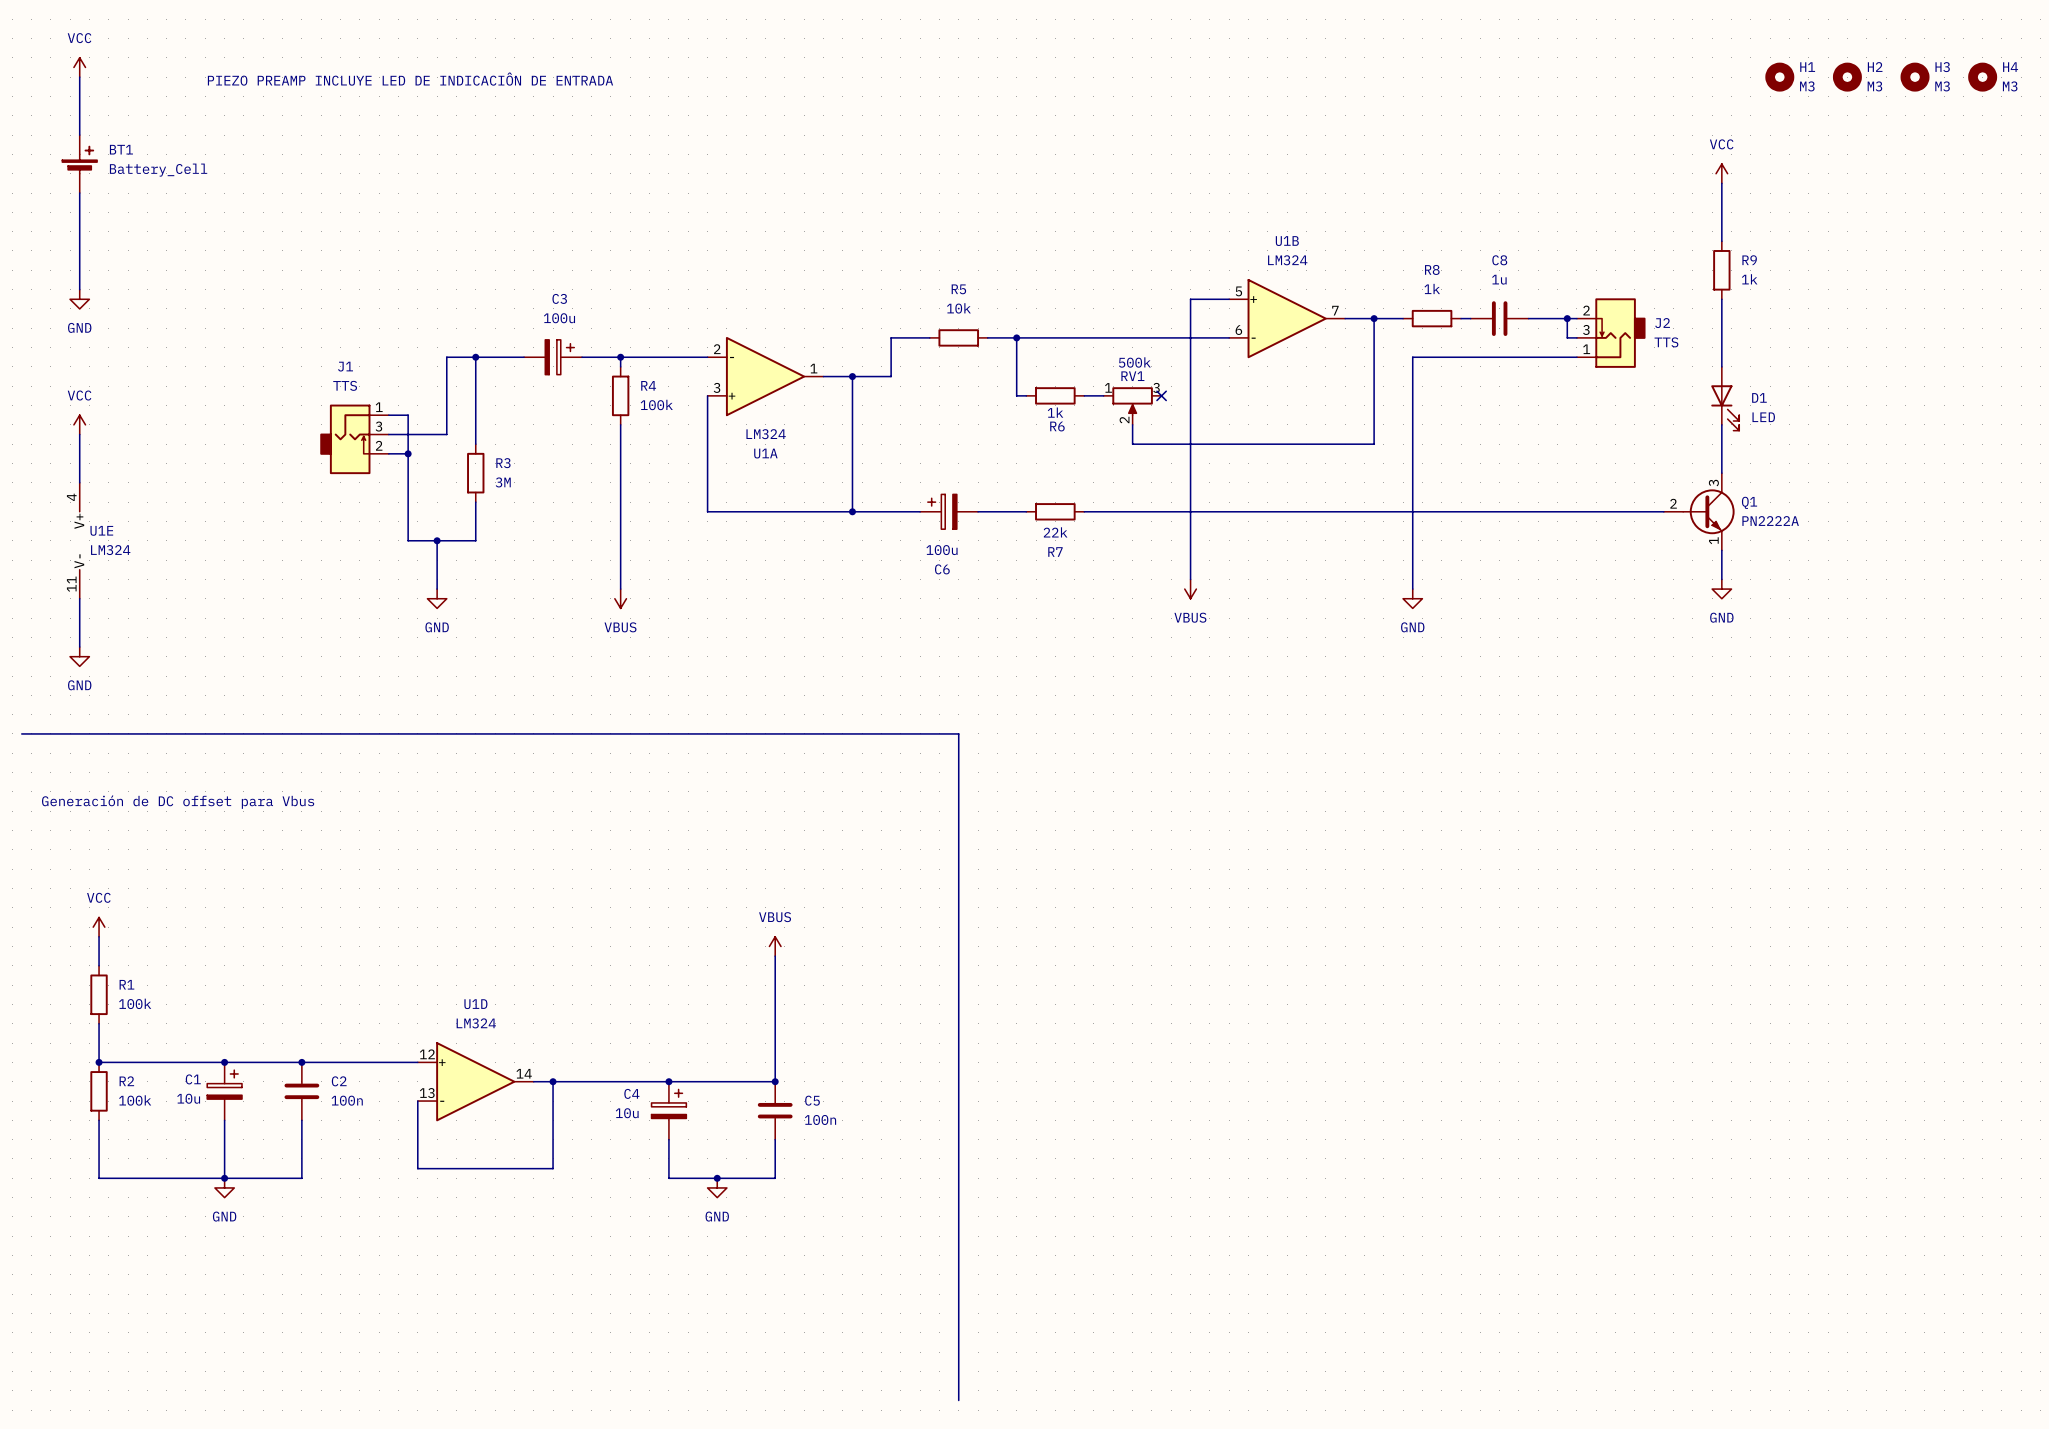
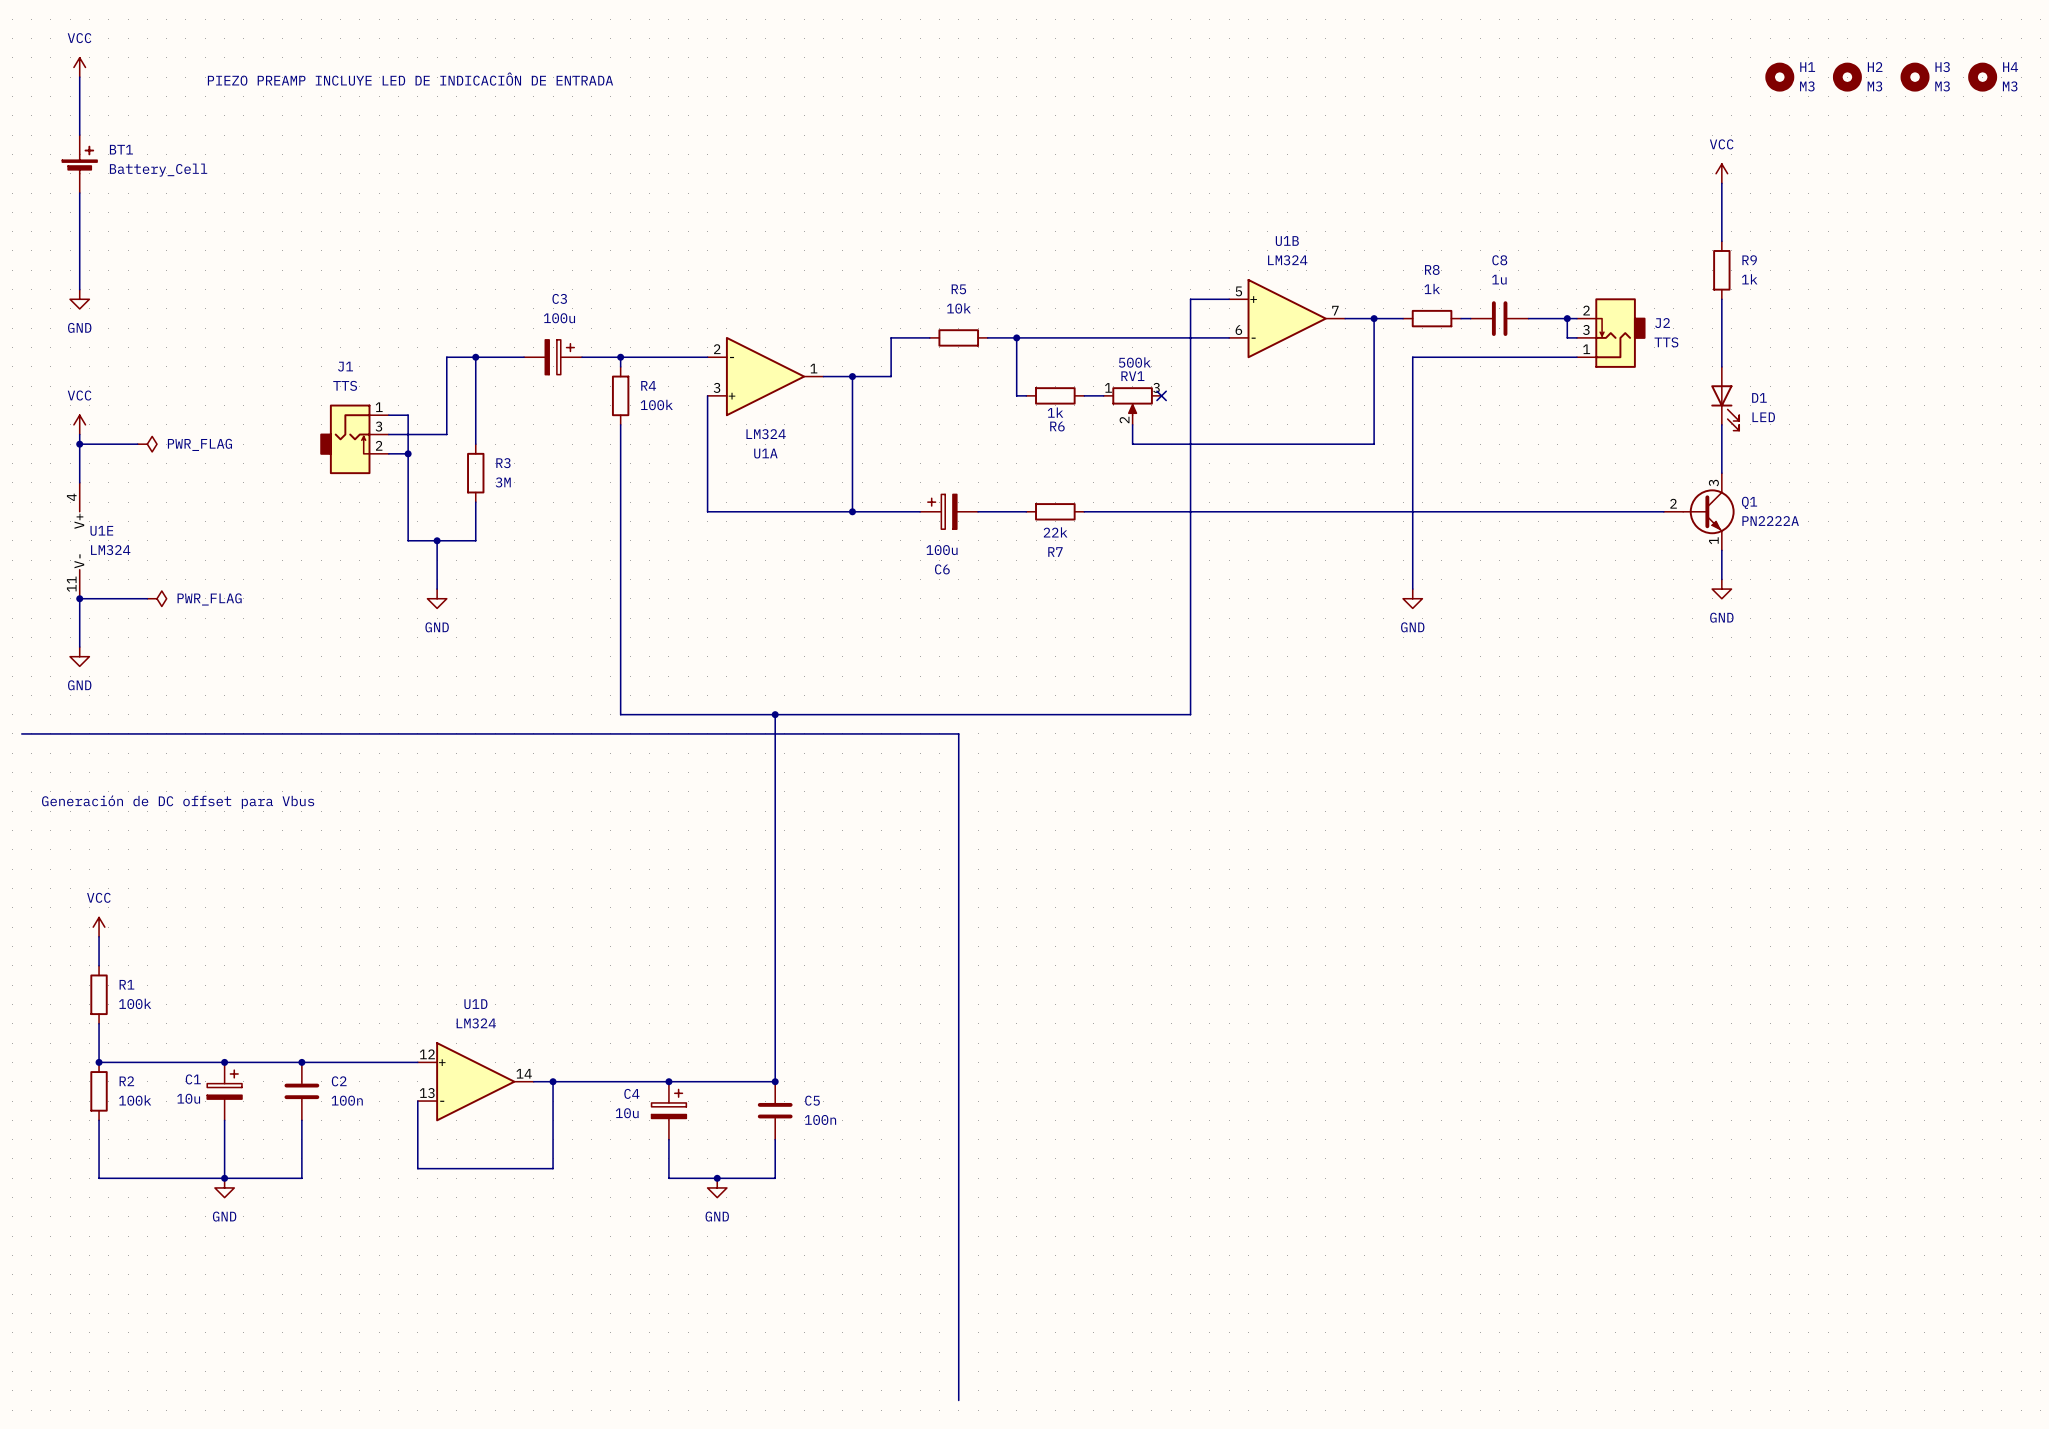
wire: none -> (79, 444) (137, 444)
junction: none -> (79, 444)
power symbol: none -> PWR_FLAG (147, 444)
wire: none -> (1190, 579) (1190, 714) (620, 714) (620, 589)
power symbol: VBUS (1190, 589) -> none
wire: none -> (79, 598) (147, 598)
junction: none -> (79, 598)
power symbol: none -> PWR_FLAG (156, 598)
power symbol: VBUS (620, 598) -> none
wire: none -> (775, 714) (775, 956)
junction: none -> (775, 714)
power symbol: VBUS (775, 946) -> none

